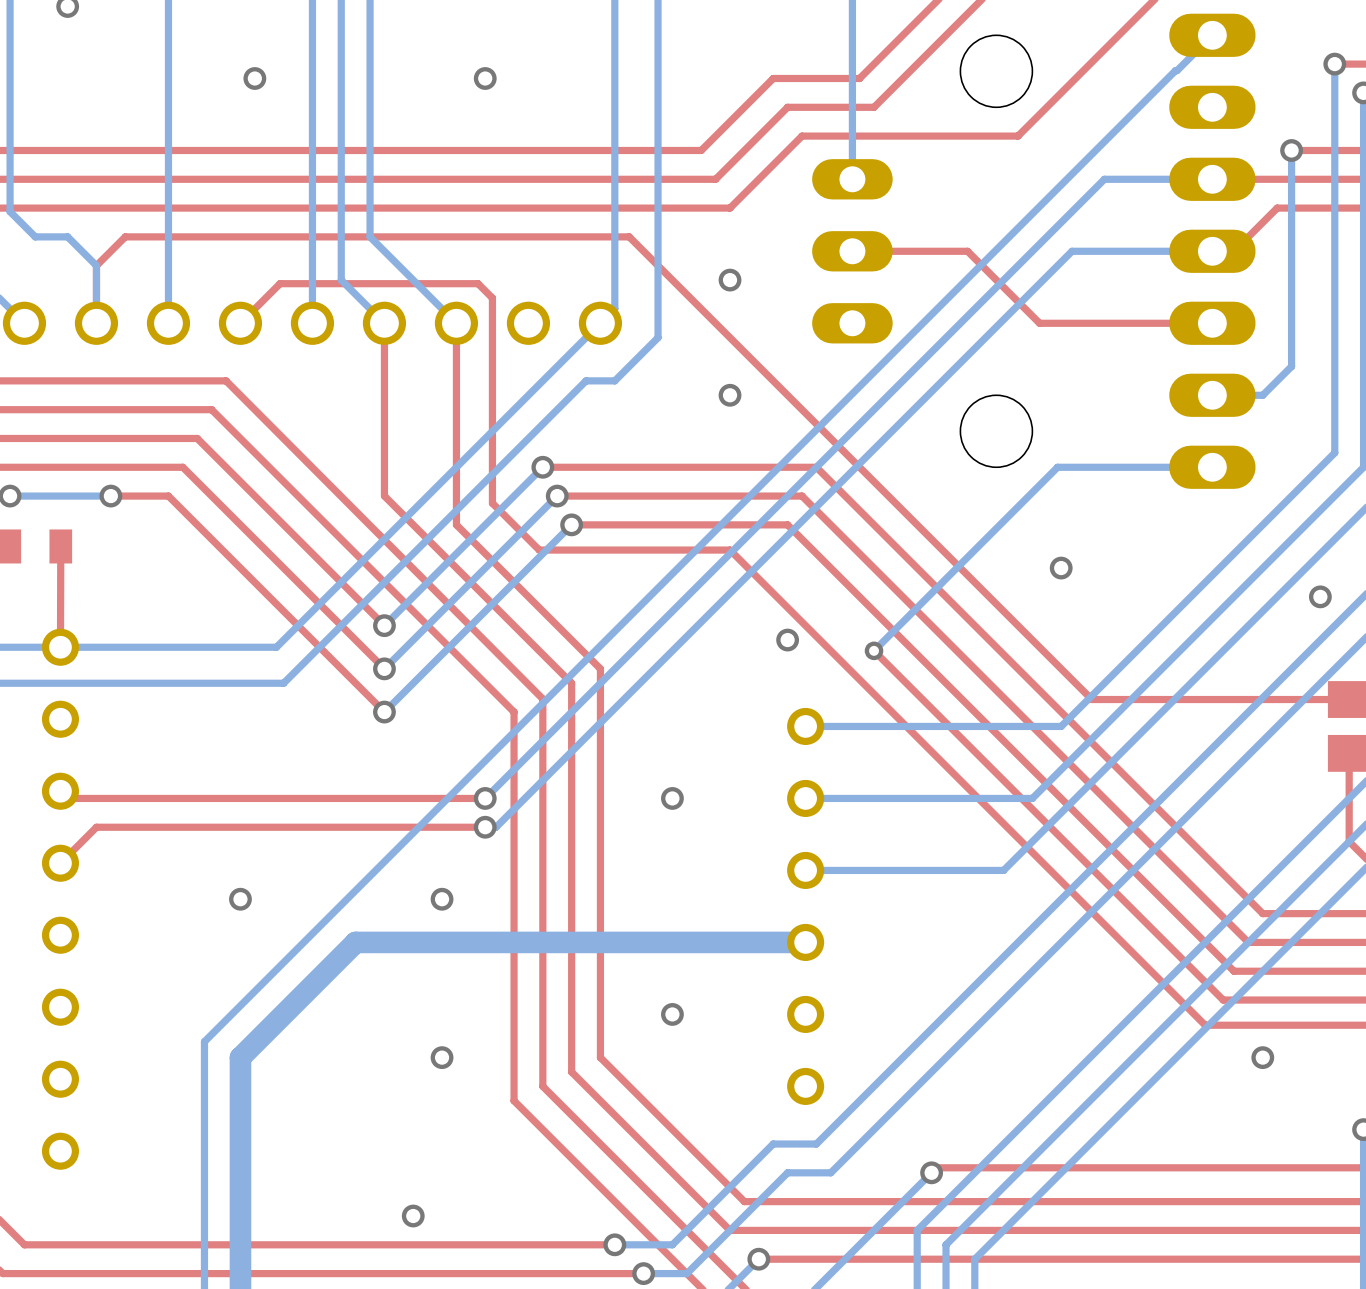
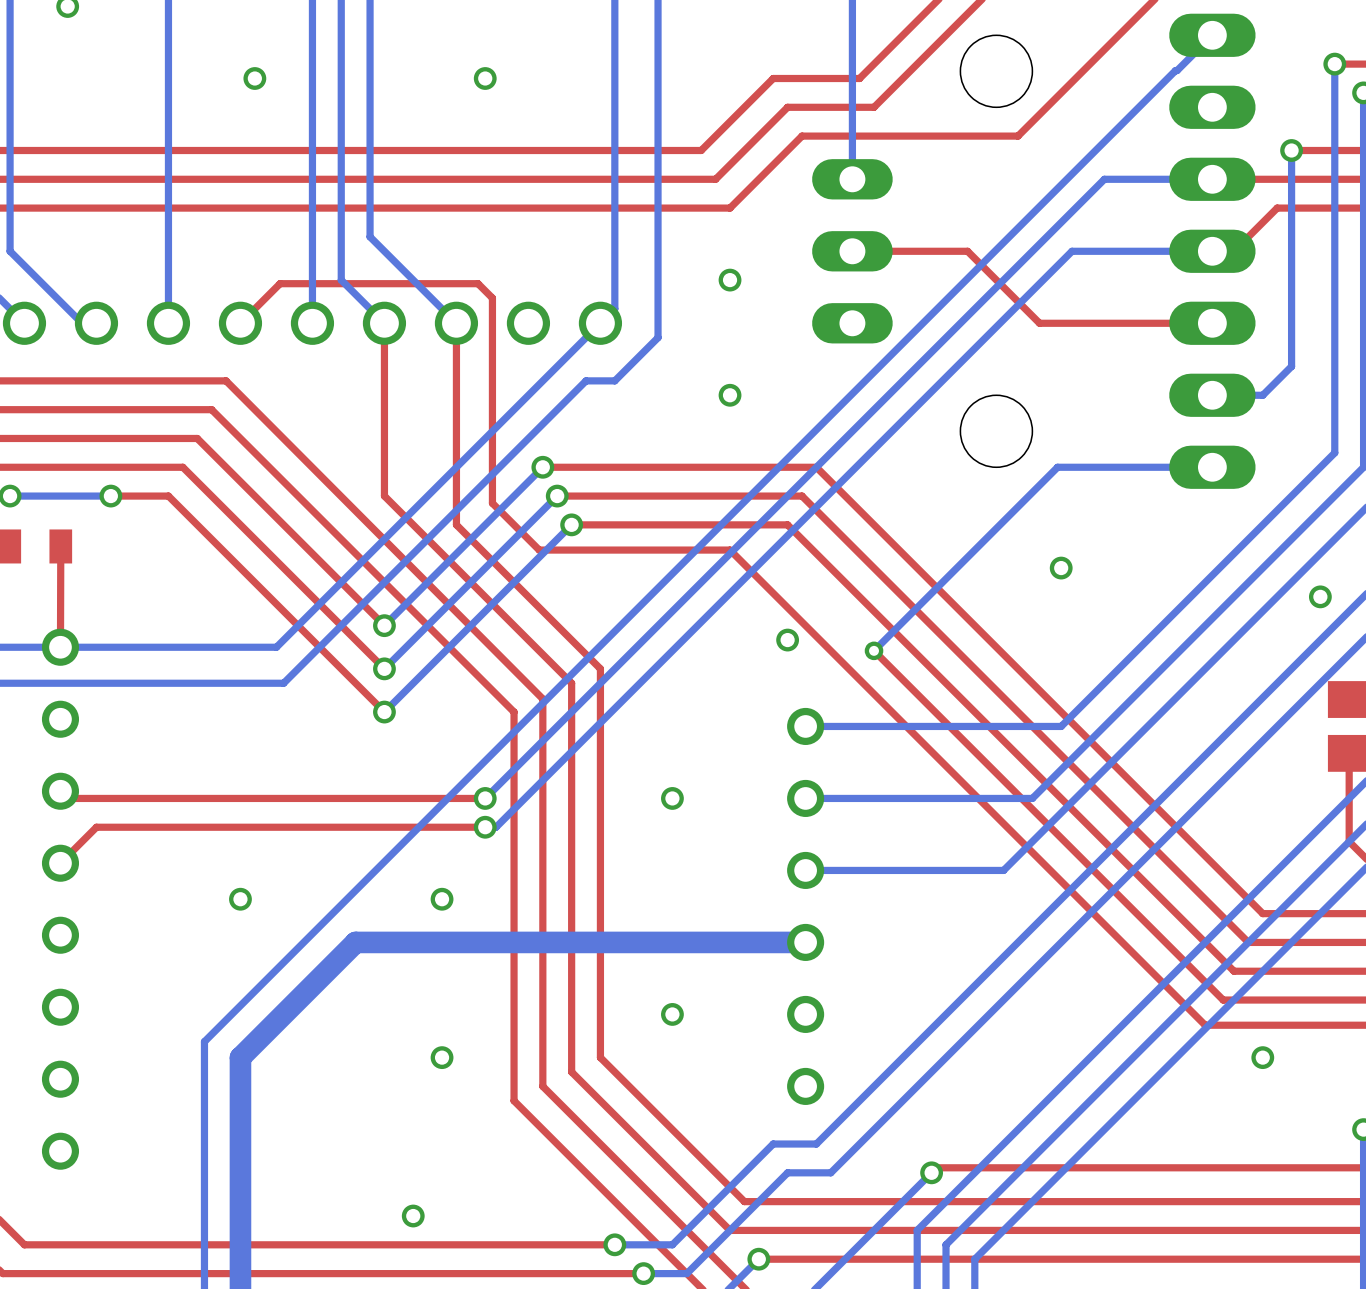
bottom track: (10, 211) (35, 236) (67, 236) (96, 265) (96, 323) -> (10, 211) (10, 251) (82, 323) (96, 323)
top track: (96, 323) (96, 265) (125, 236) (629, 236) (1091, 699) (1349, 699) -> none

